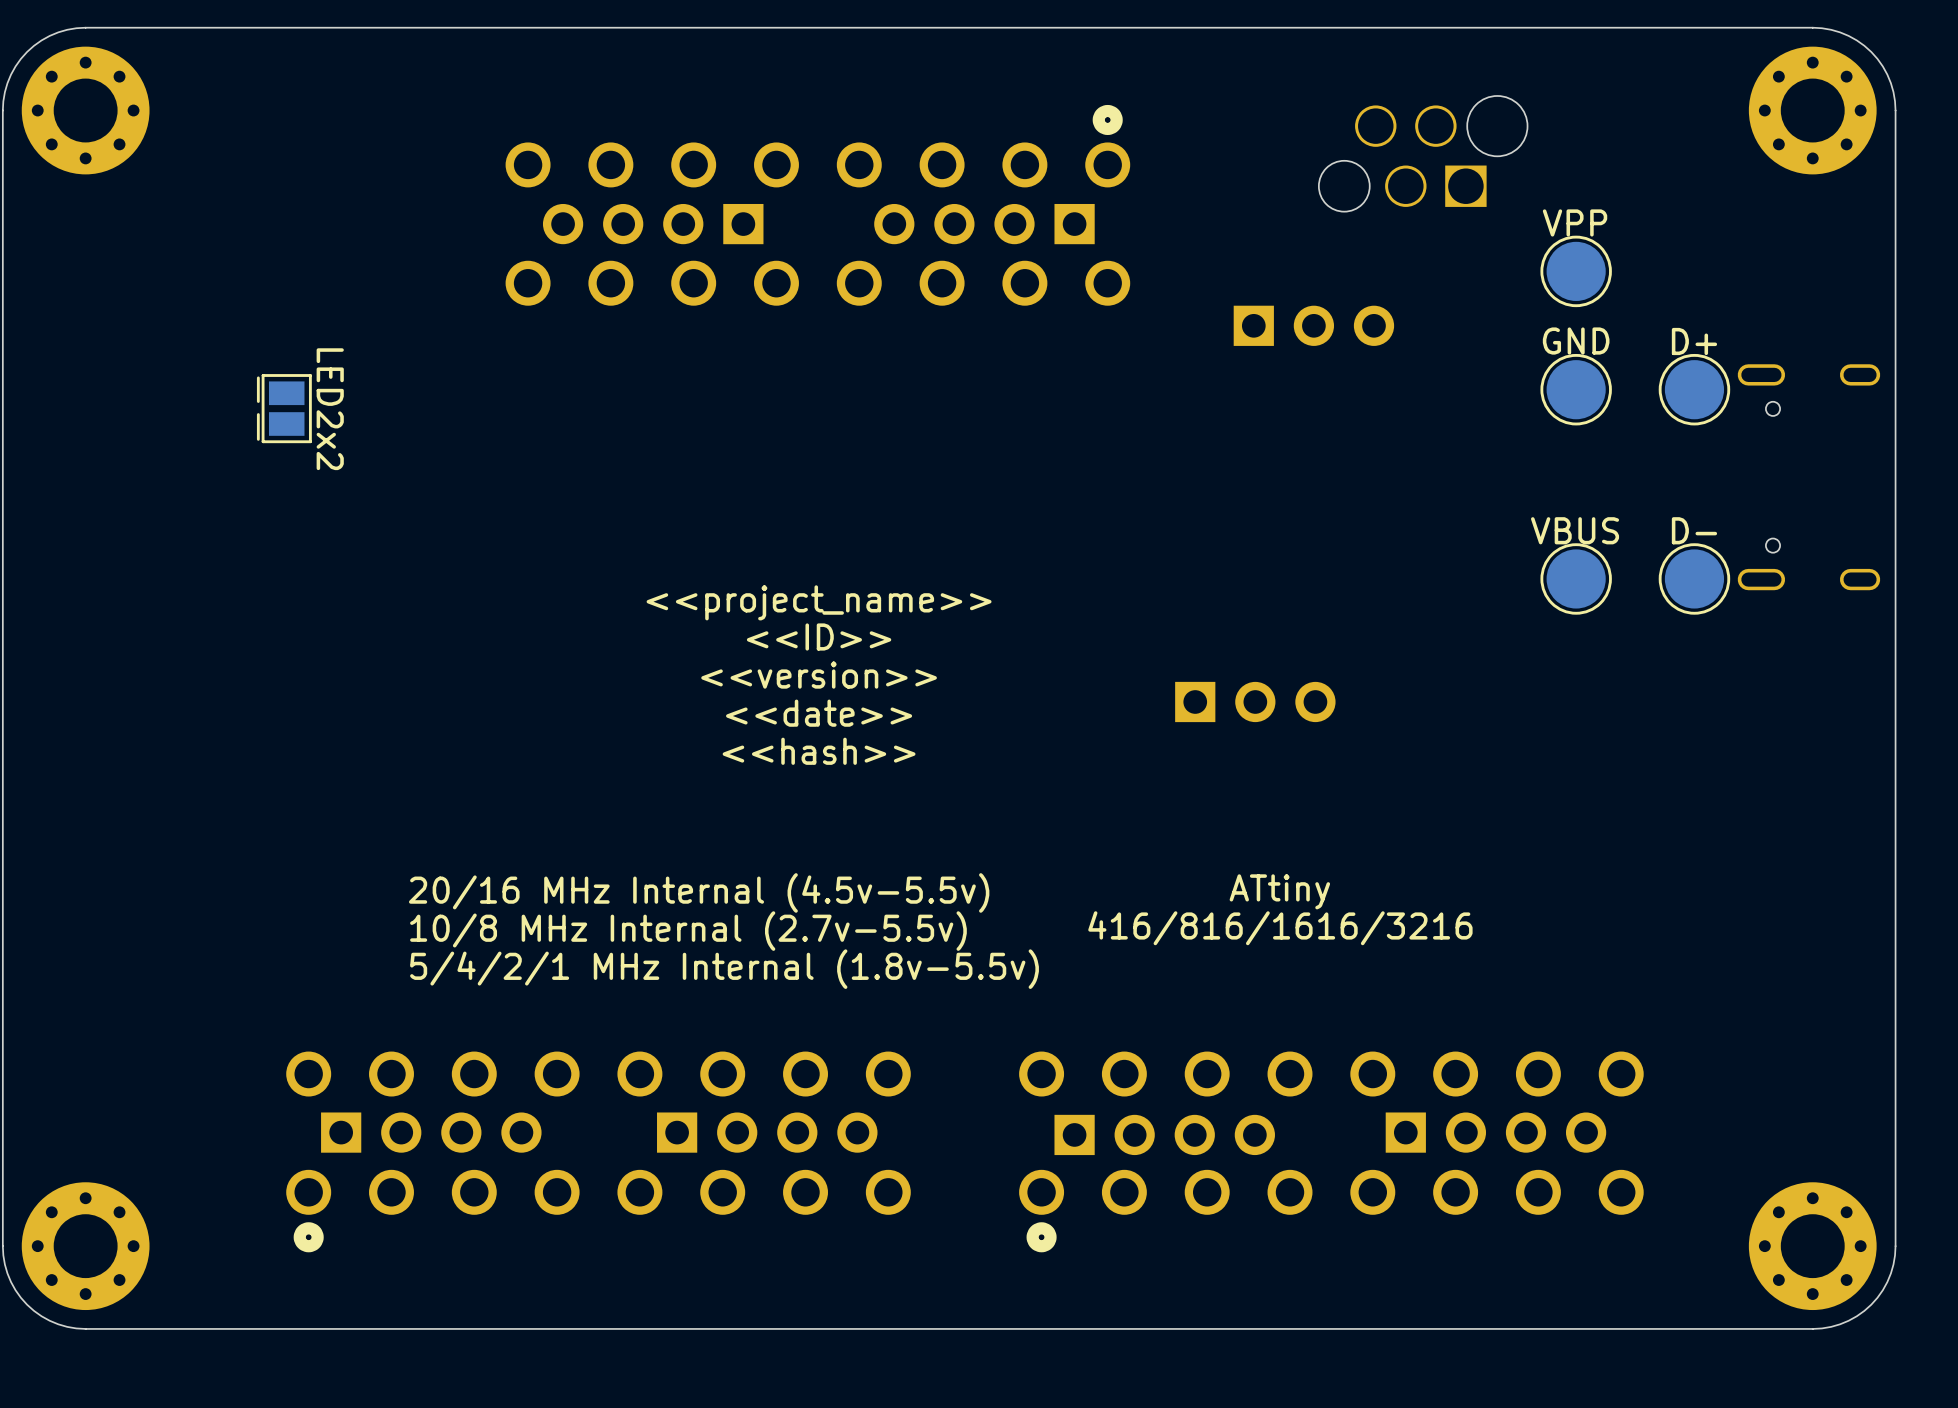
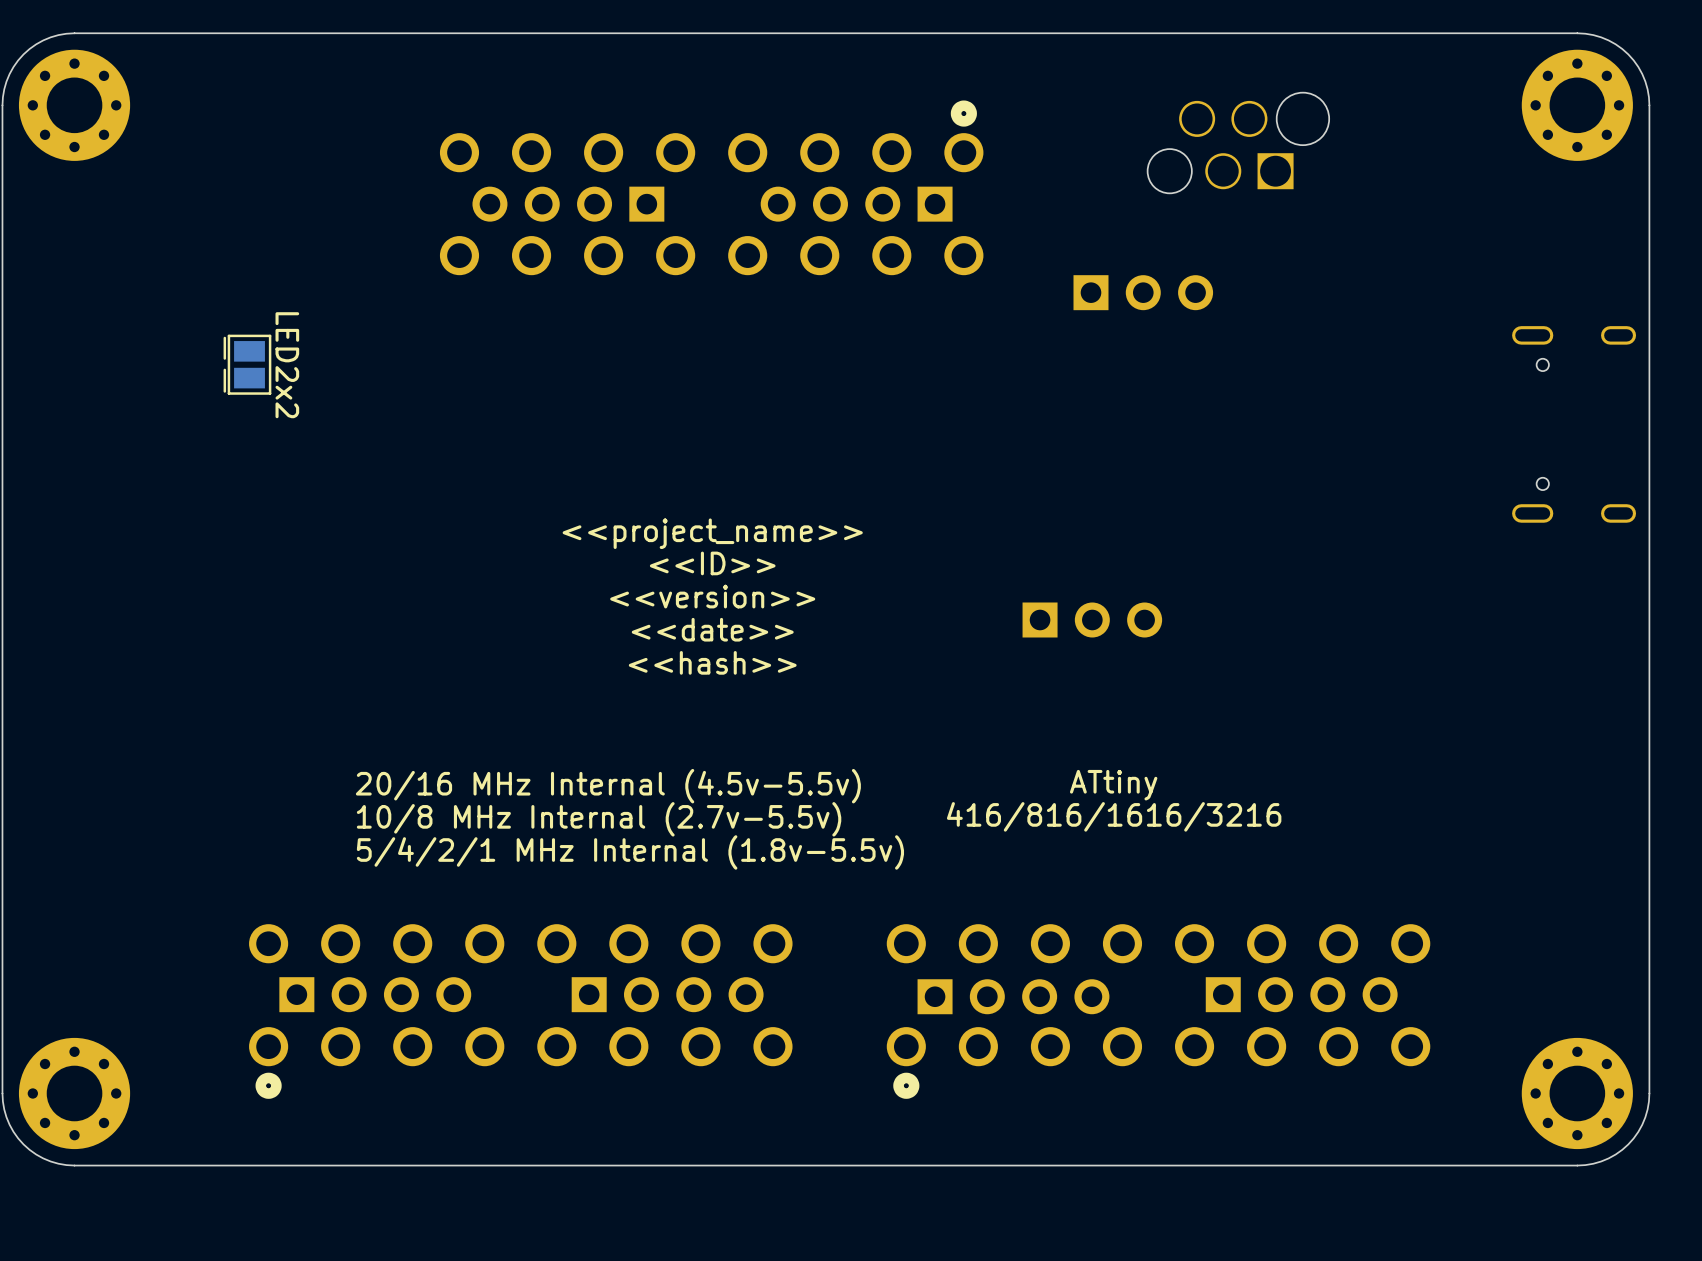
part: VPP (1576, 271) -> none
part: GND (1576, 389) -> none
part: D+ (1694, 389) -> none
part: VBUS (1576, 578) -> none
part: D- (1694, 578) -> none

